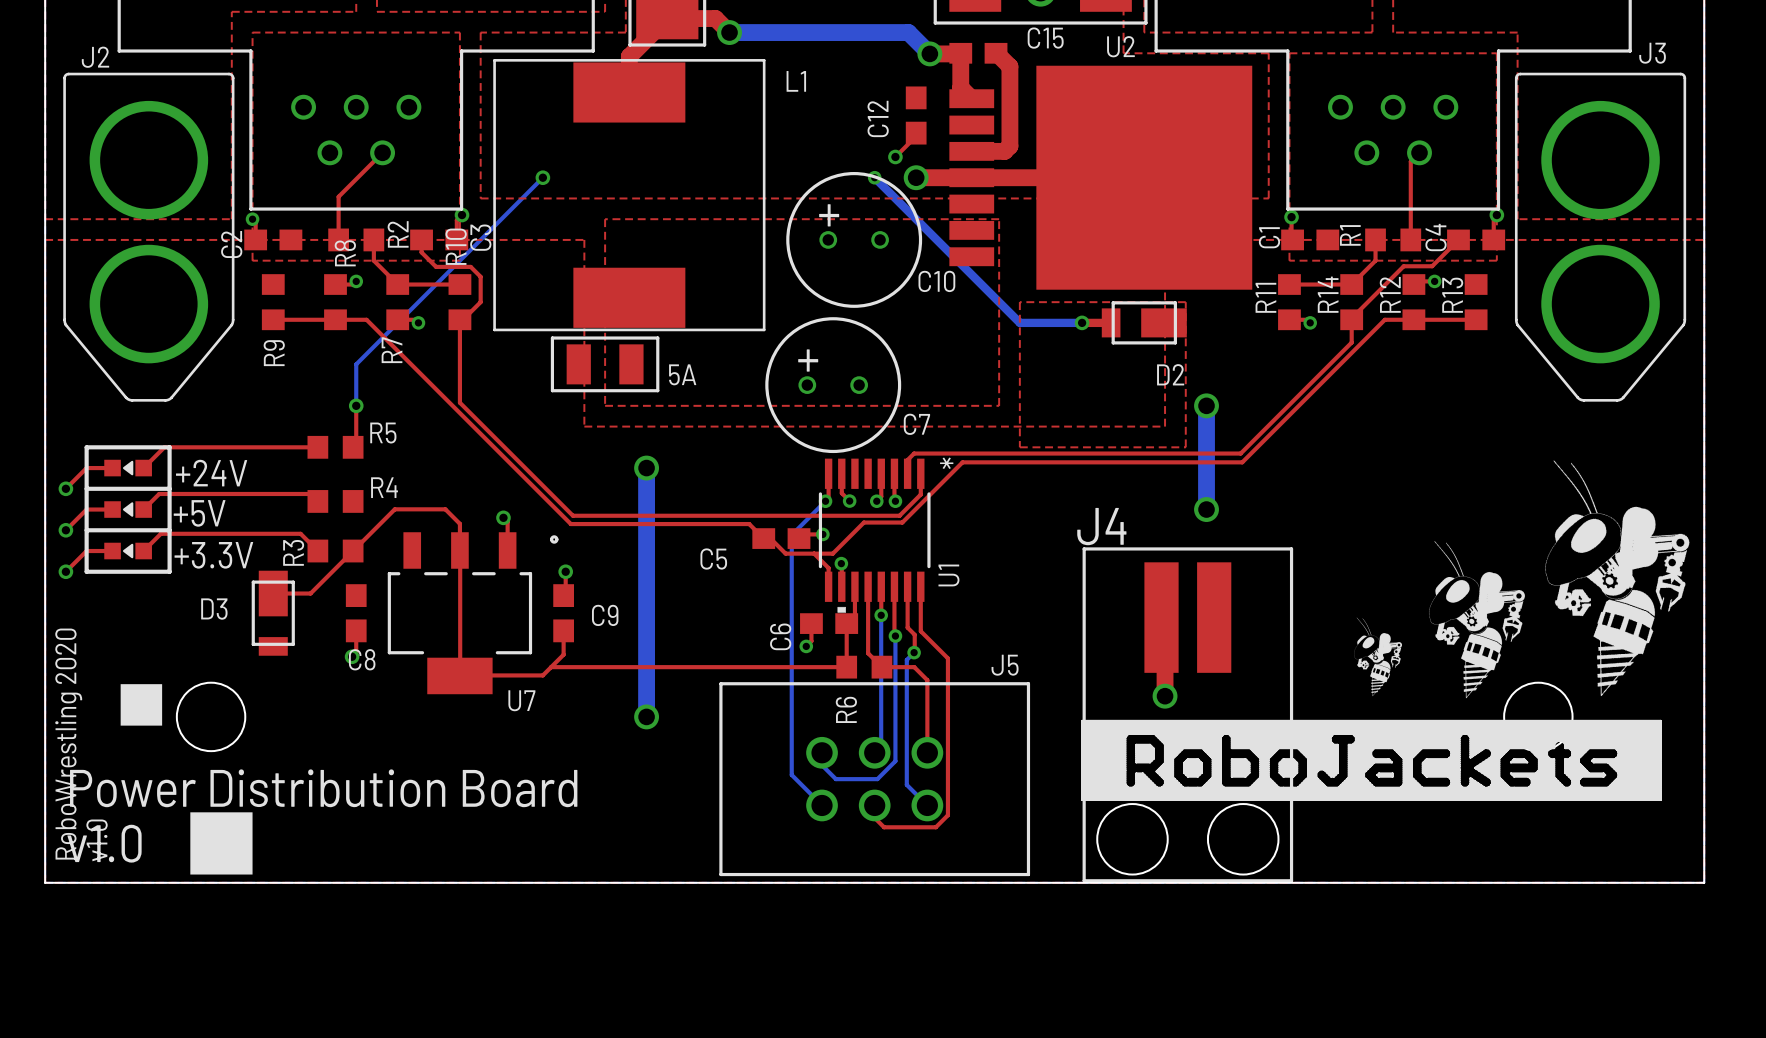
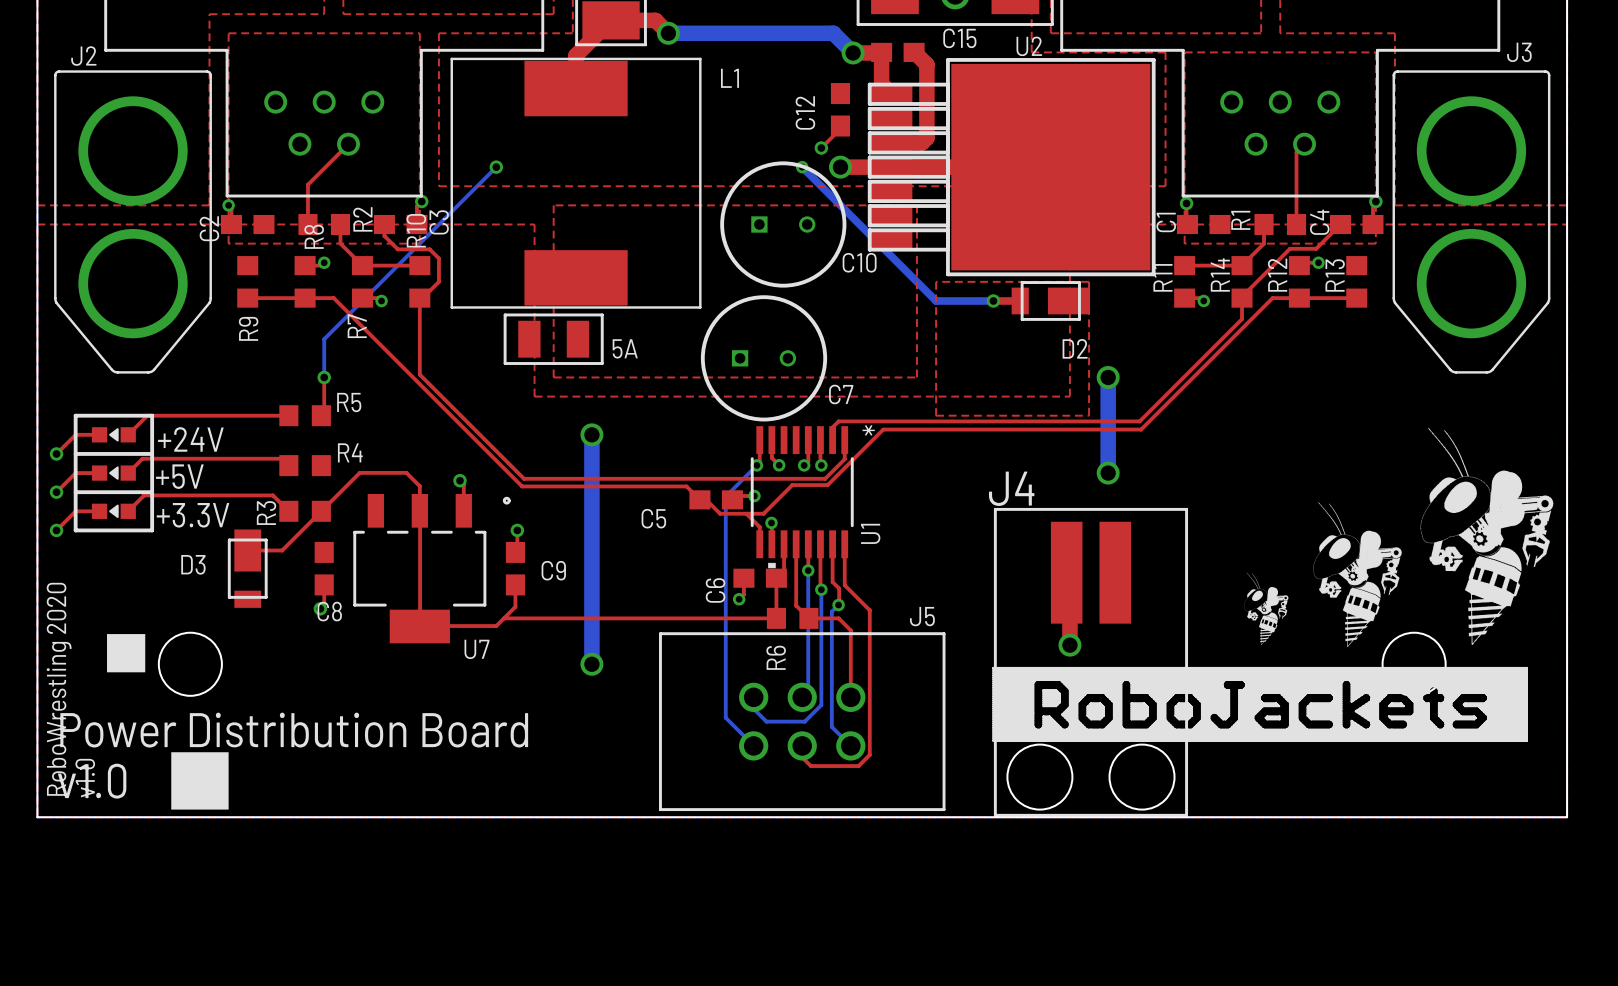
U2 footprint: [949, 65, 1253, 290] -> [867, 58, 1156, 277]
C10 footprint: [786, 171, 923, 308] -> [720, 161, 847, 288]
C7 footprint: [765, 317, 902, 454] -> [700, 295, 828, 422]

